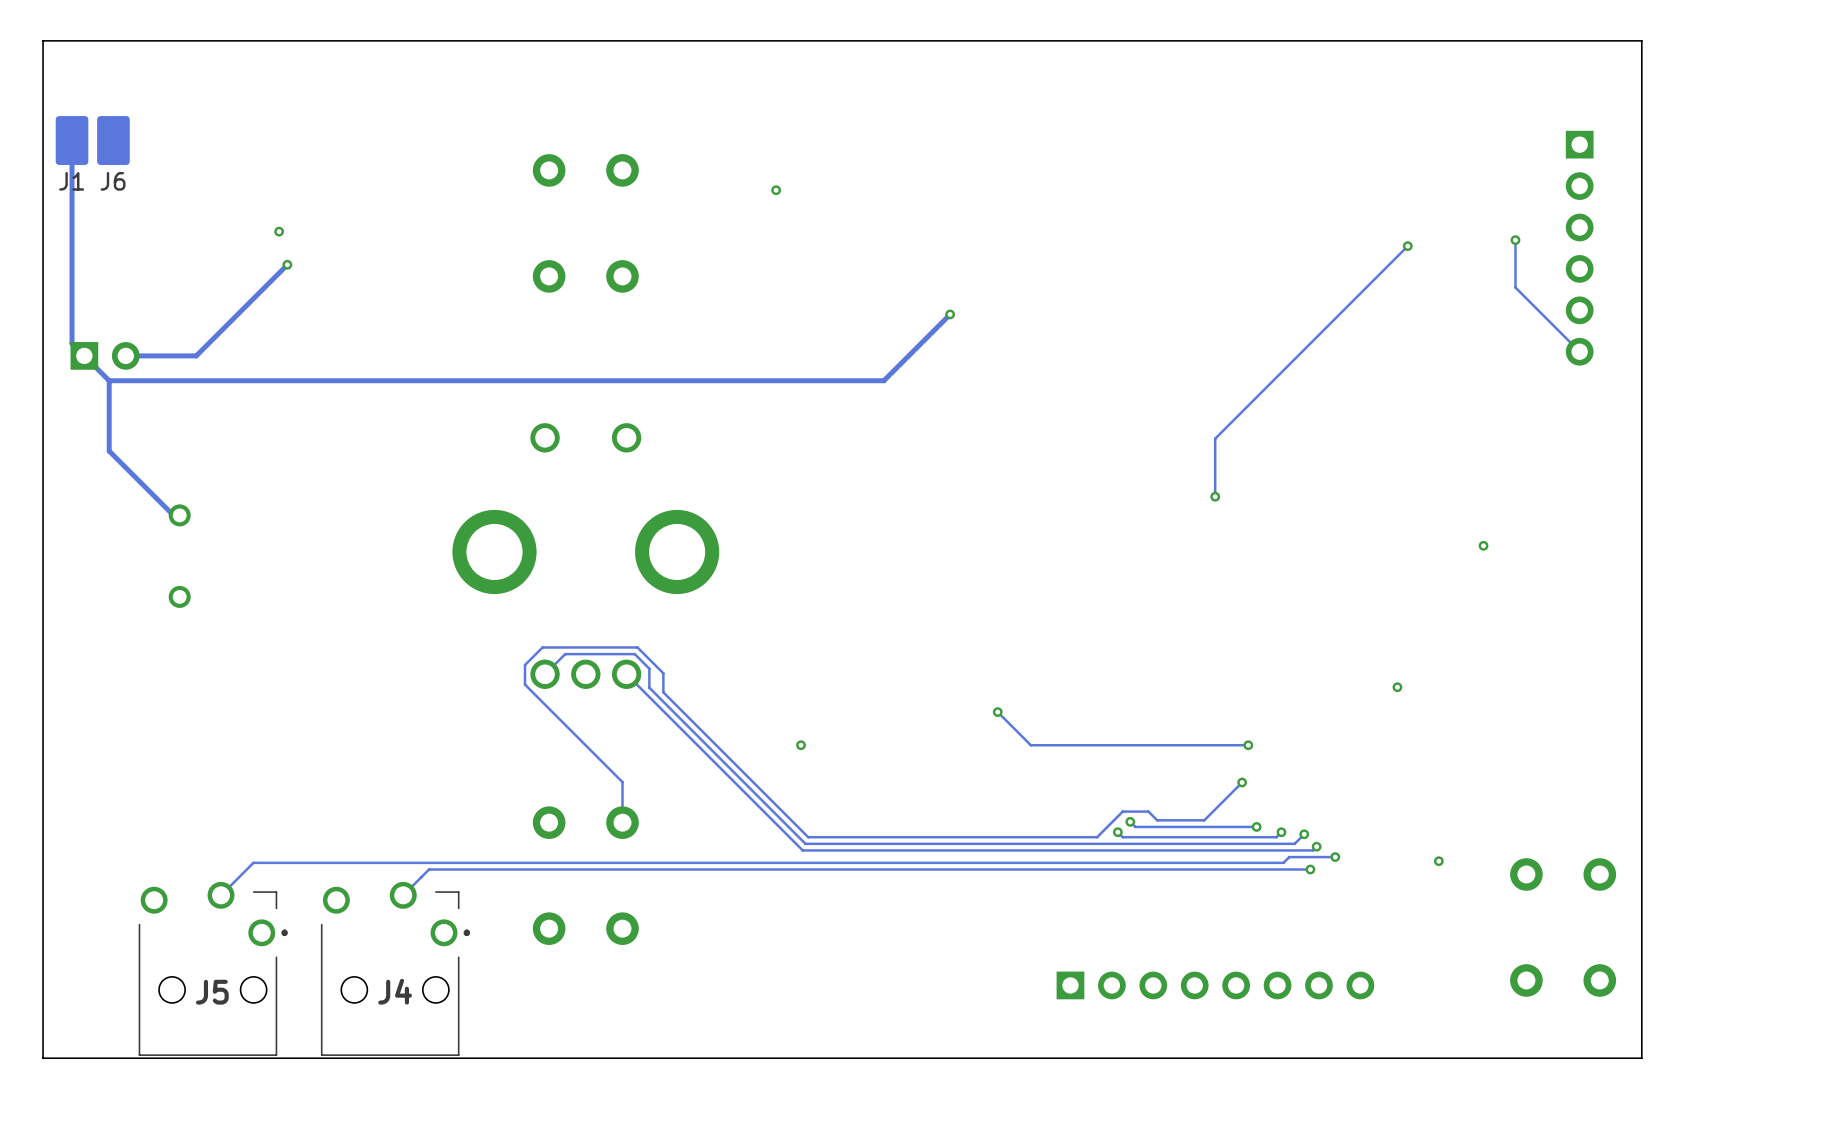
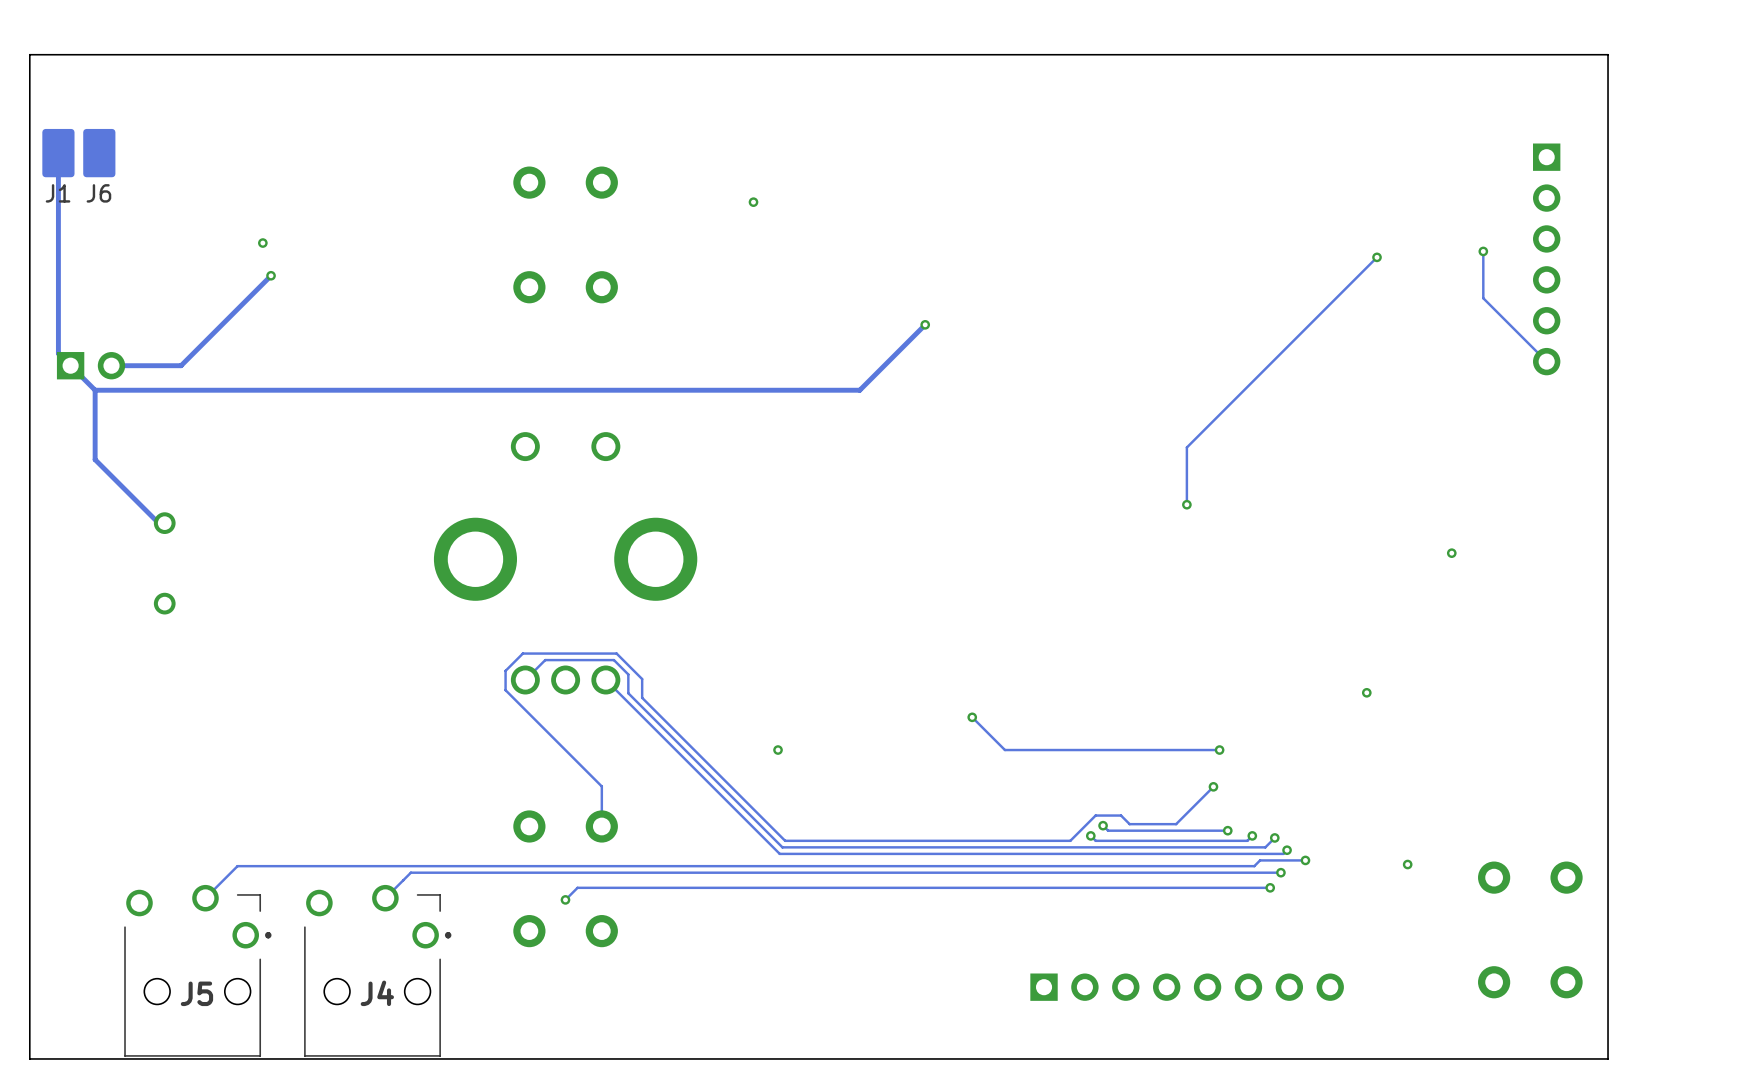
track: none -> (1270, 887) (577, 887) (565, 899)
via: none -> (1270, 887)
via: none -> (565, 899)

